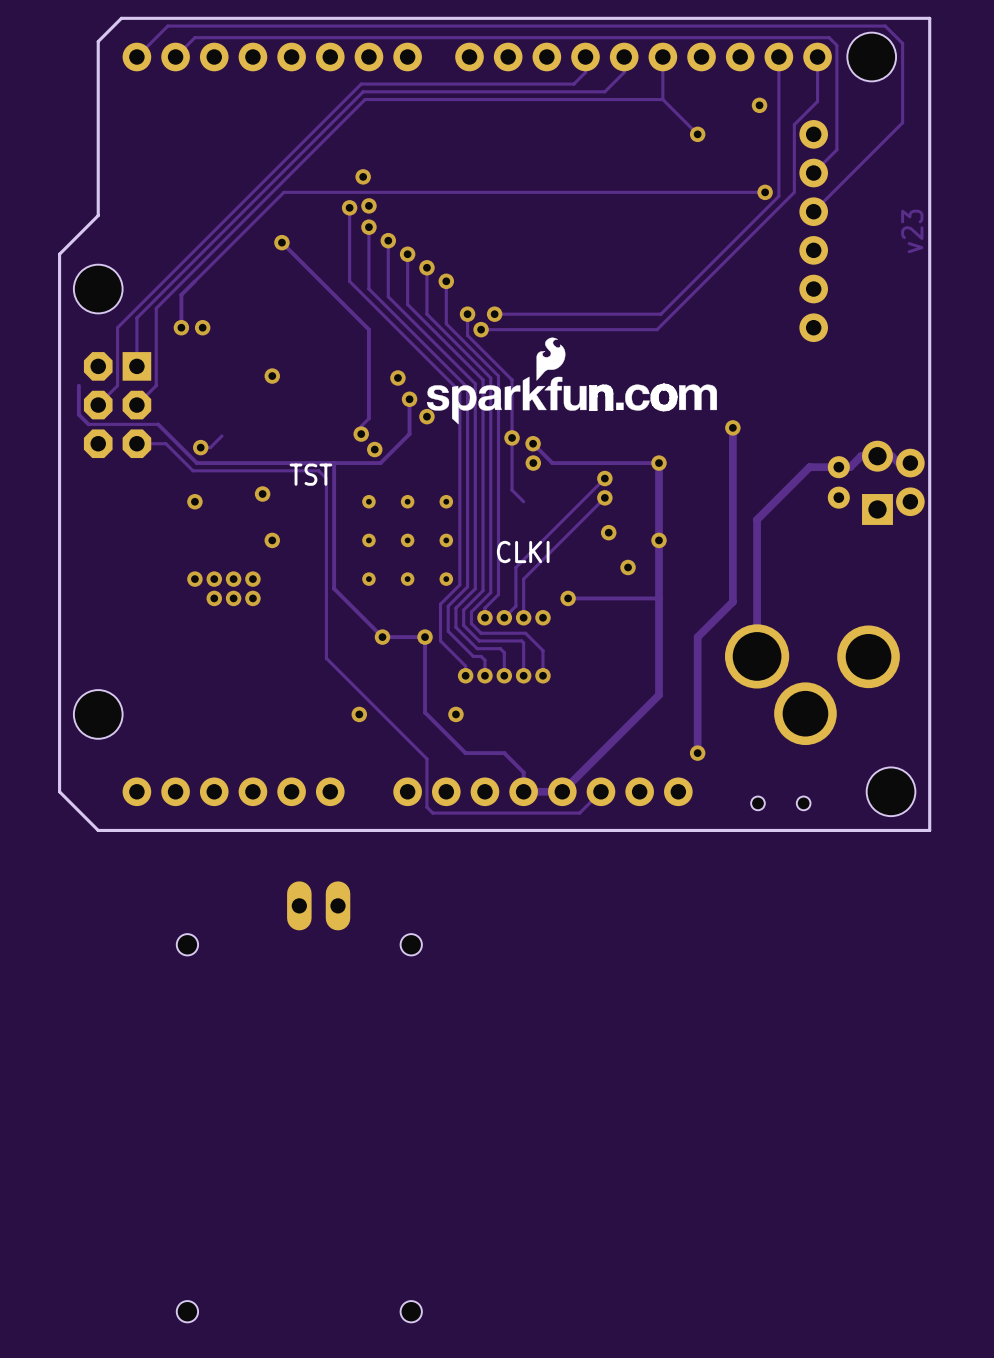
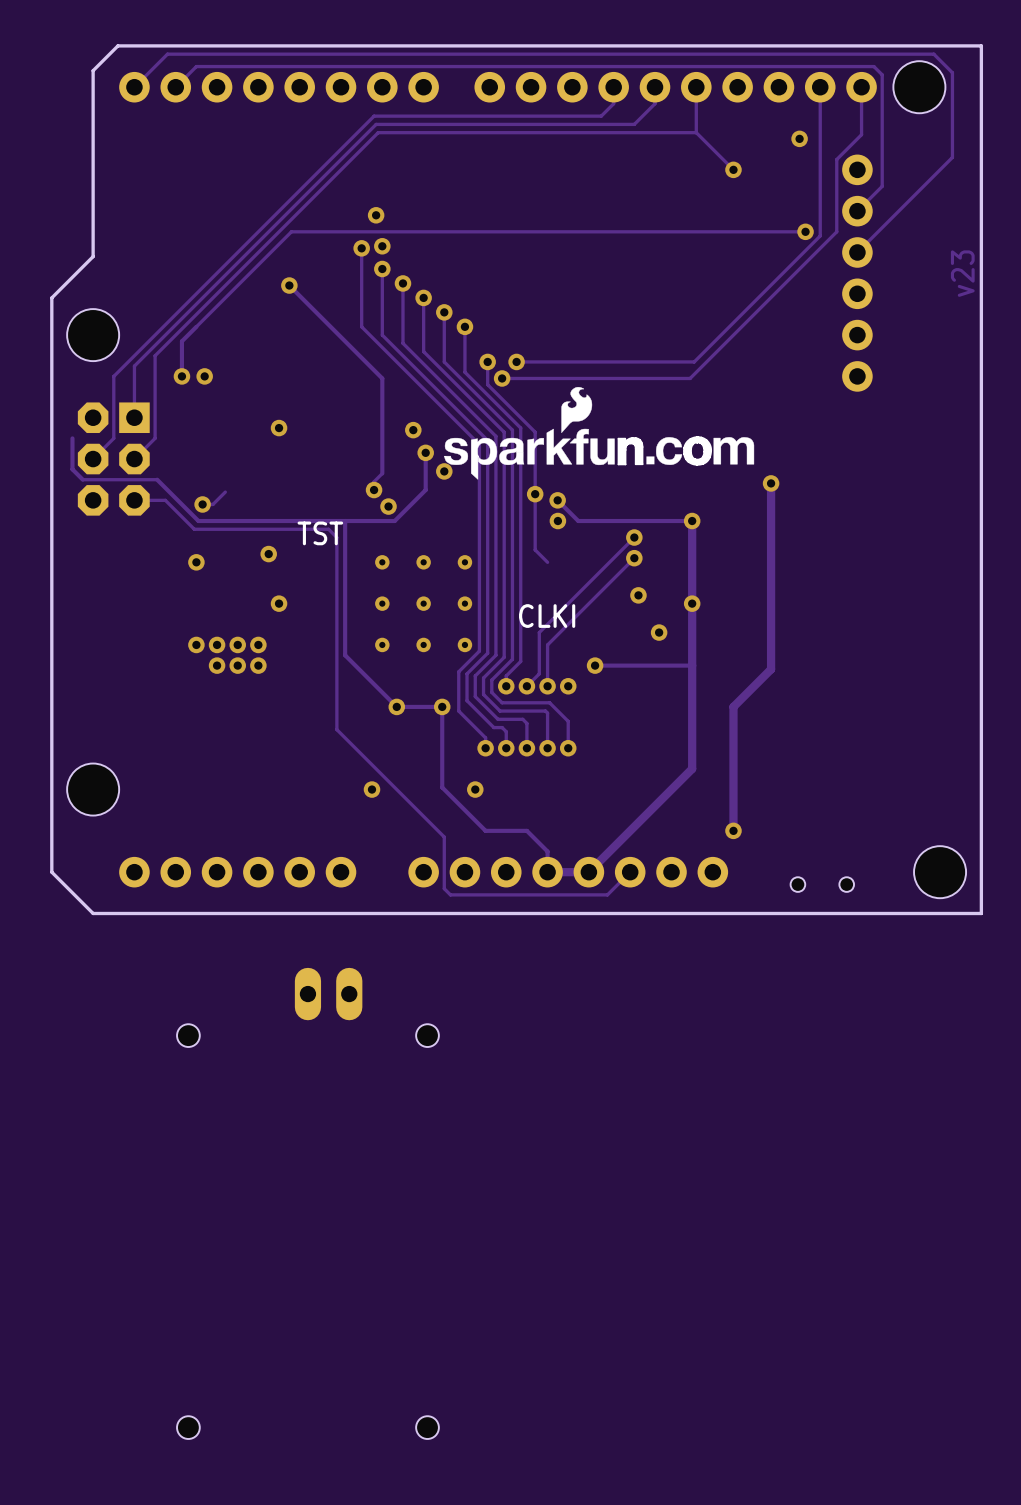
track: (910, 463) (898, 463) (891, 456) (861, 456) (850, 467) (809, 467) (757, 519) (757, 656) -> none
part: (838, 482) -> none
part: (877, 482) -> none
part: (910, 482) -> none
part: (812, 684) -> none

